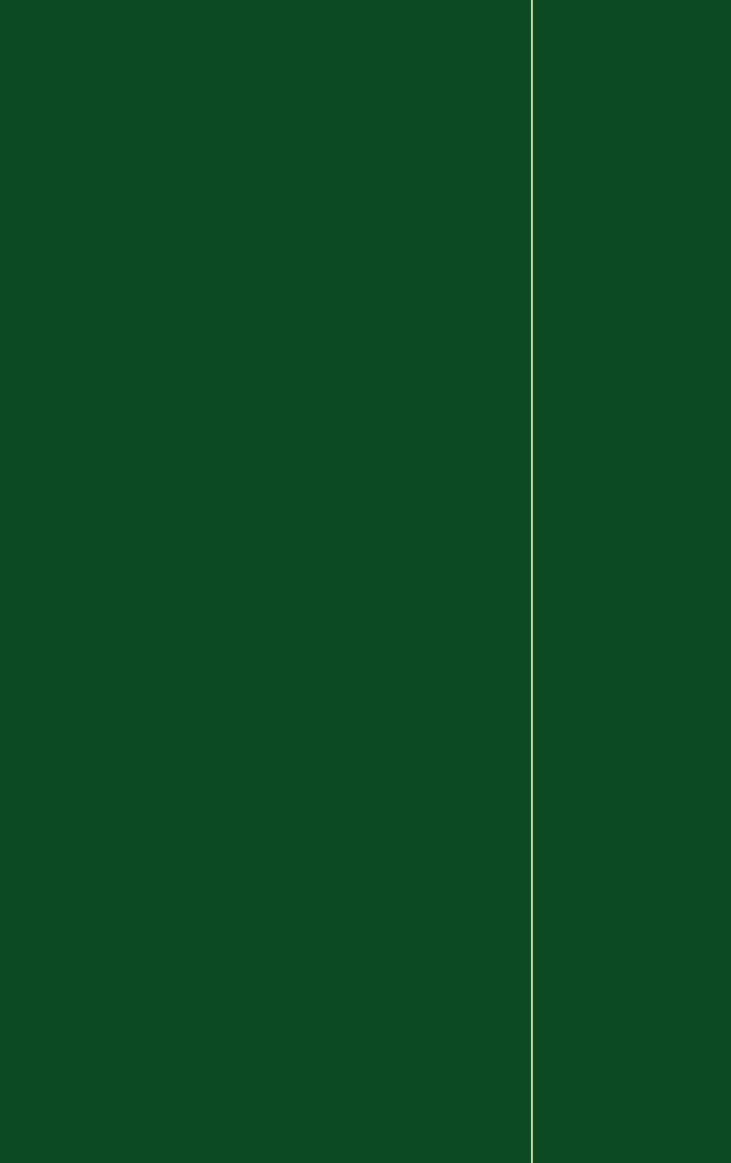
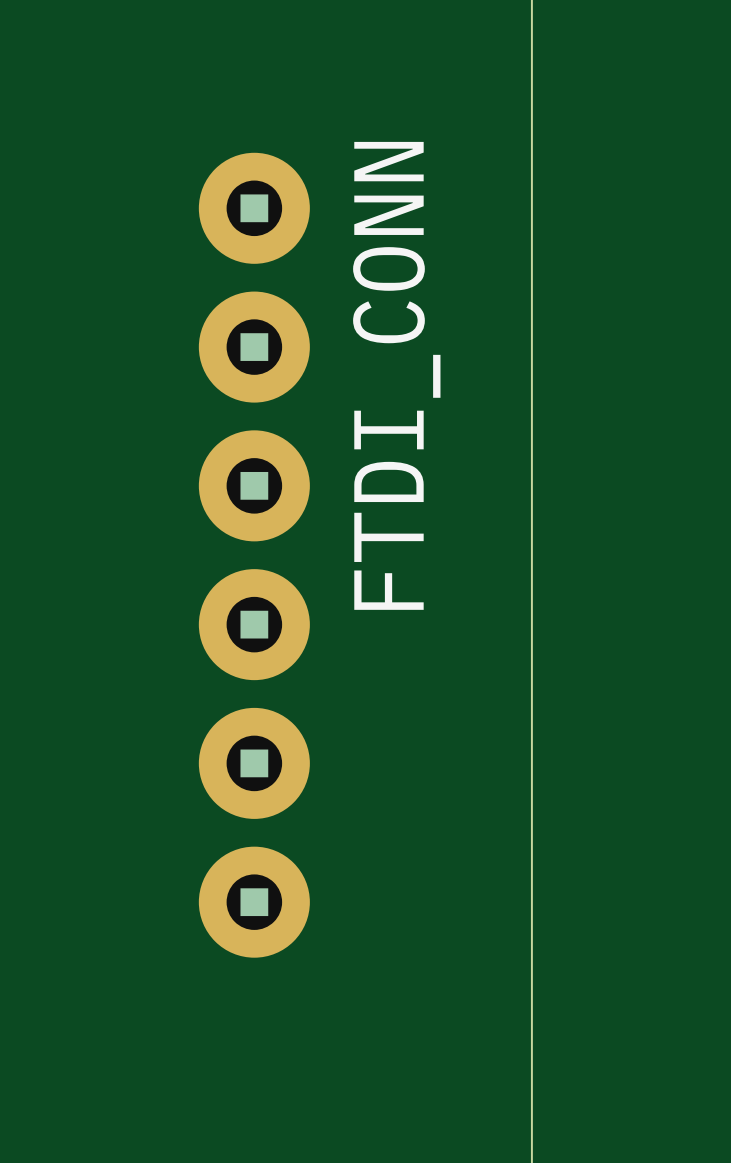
FTDI_CONN: none -> (254, 555)

